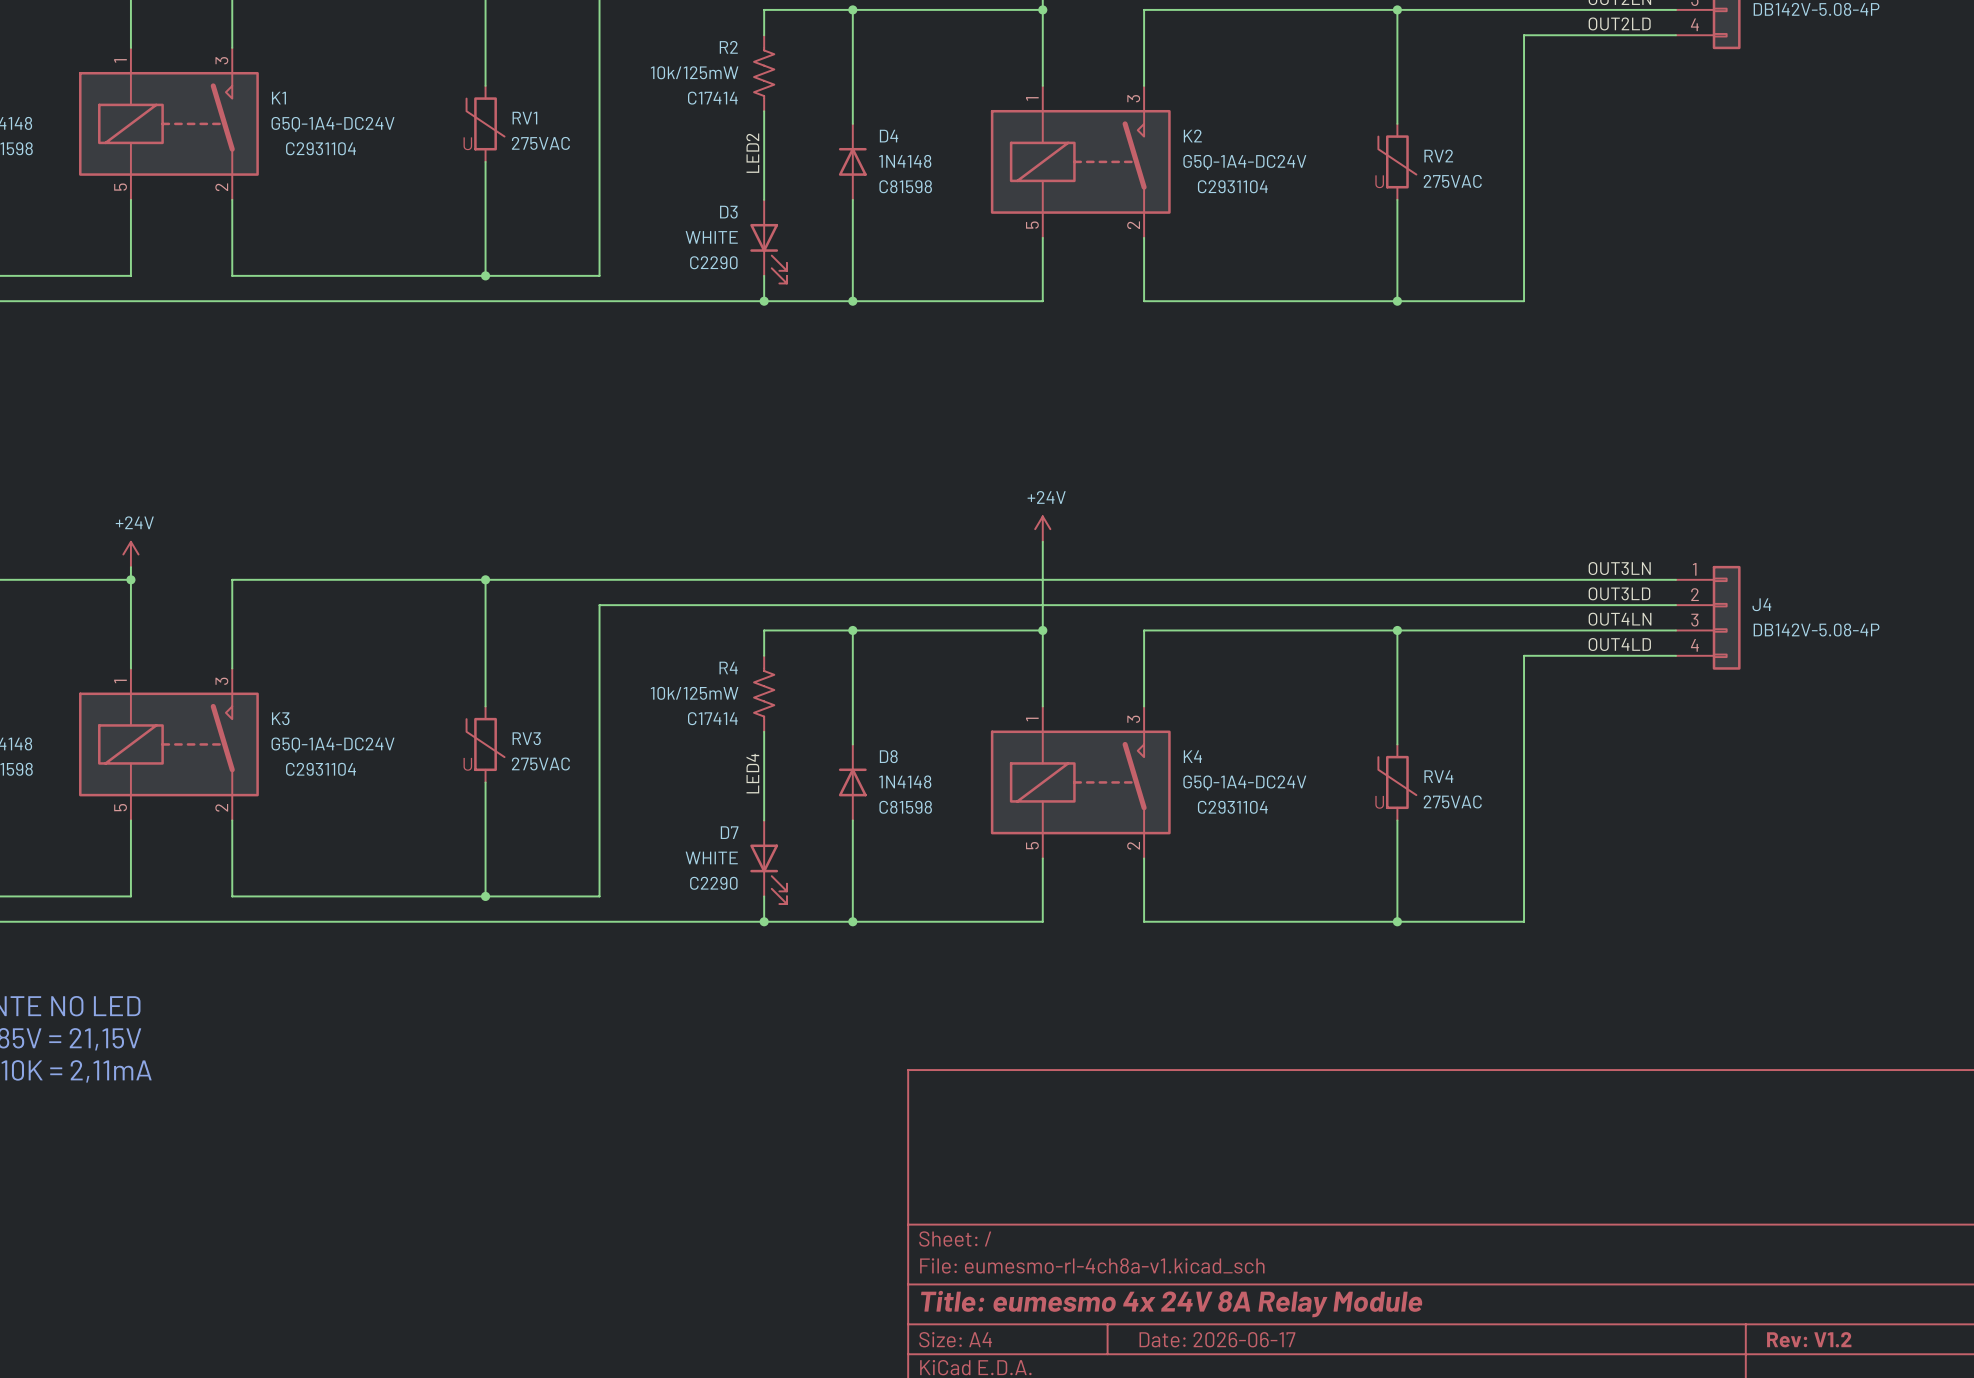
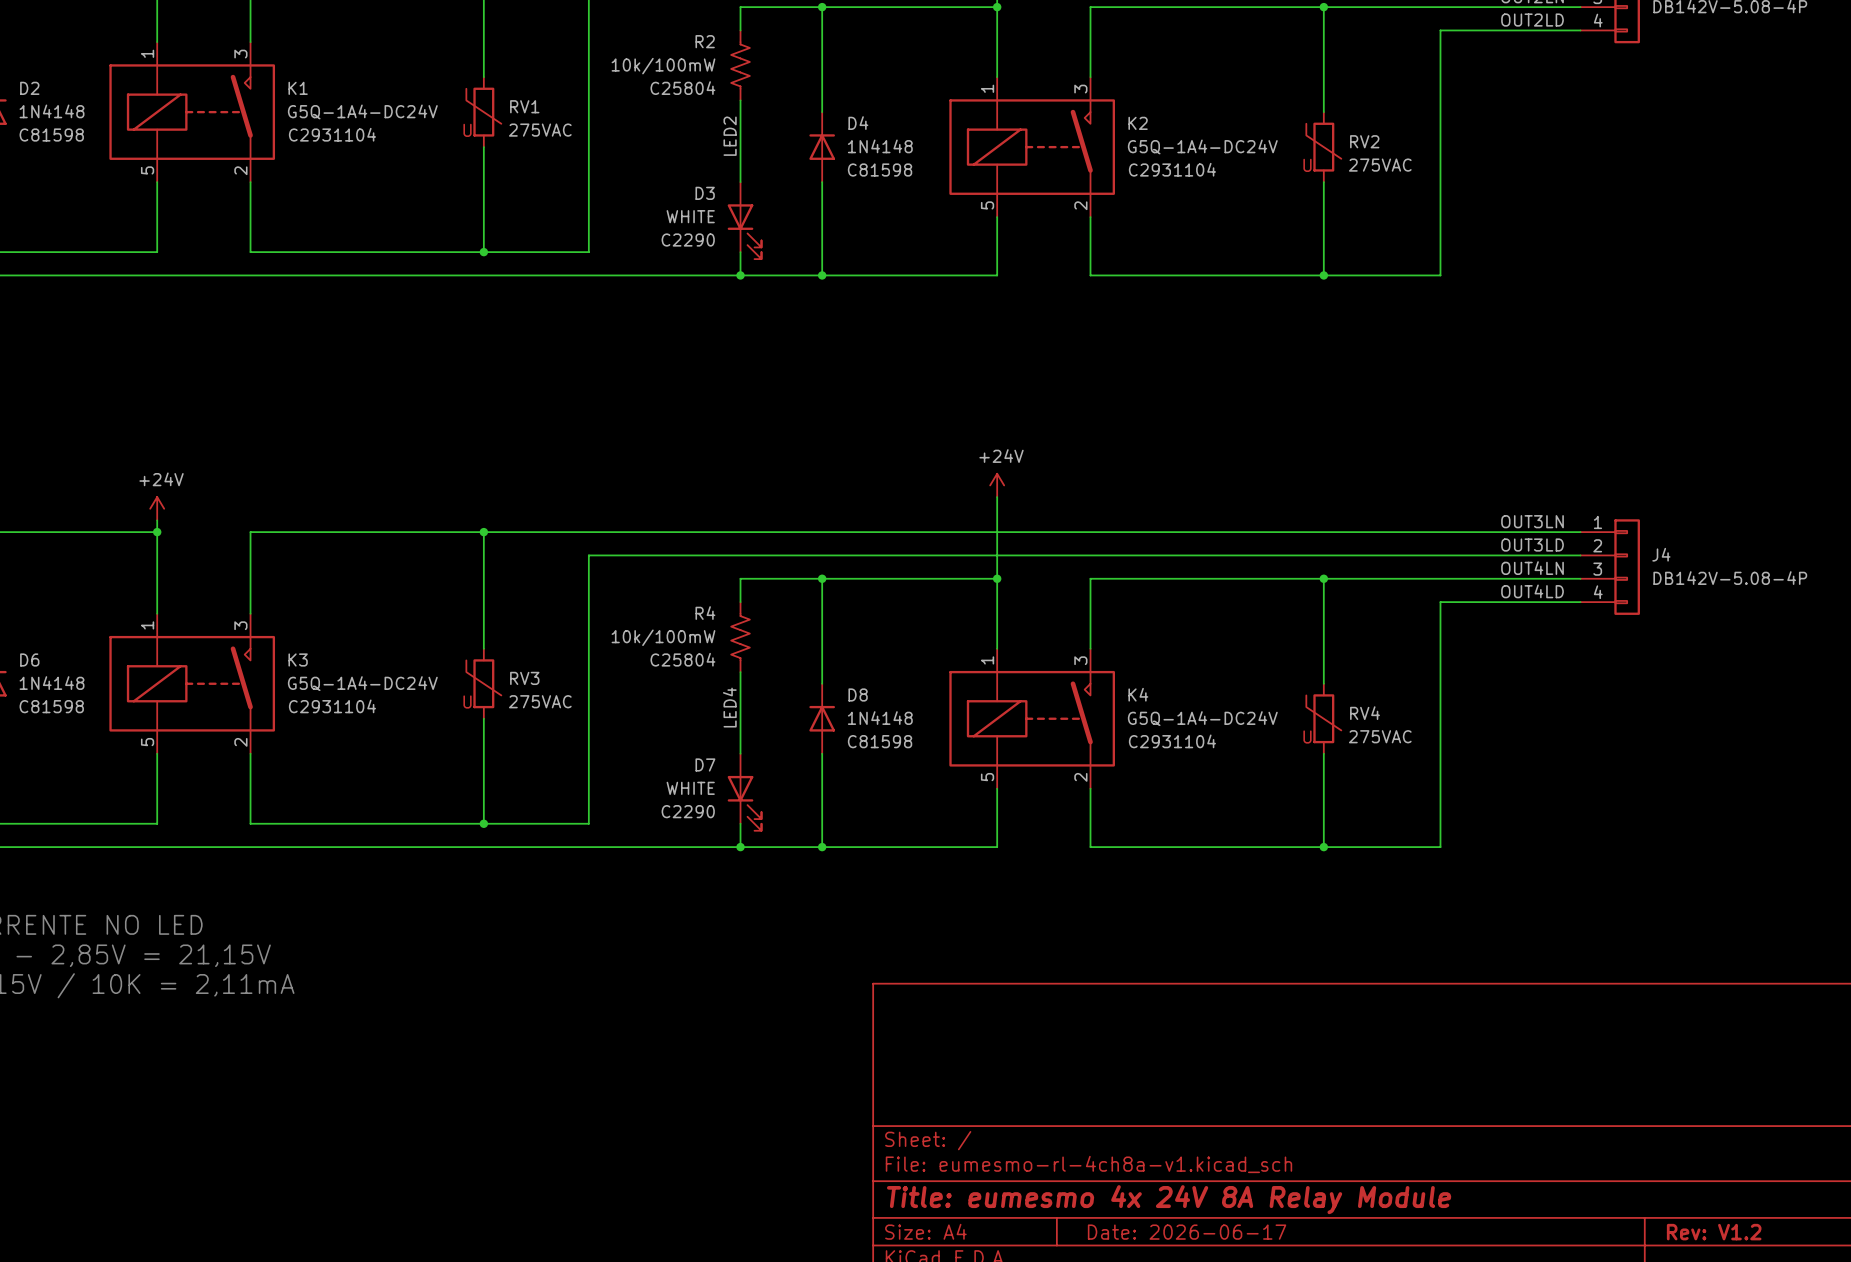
R2 value: 10k/125mW (694, 72) -> 10k/100mW (663, 66)
R2 text: C17414 (712, 98) -> C25804 (682, 88)
R4 value: 10k/125mW (694, 693) -> 10k/100mW (663, 637)
R4 text: C17414 (712, 718) -> C25804 (682, 659)

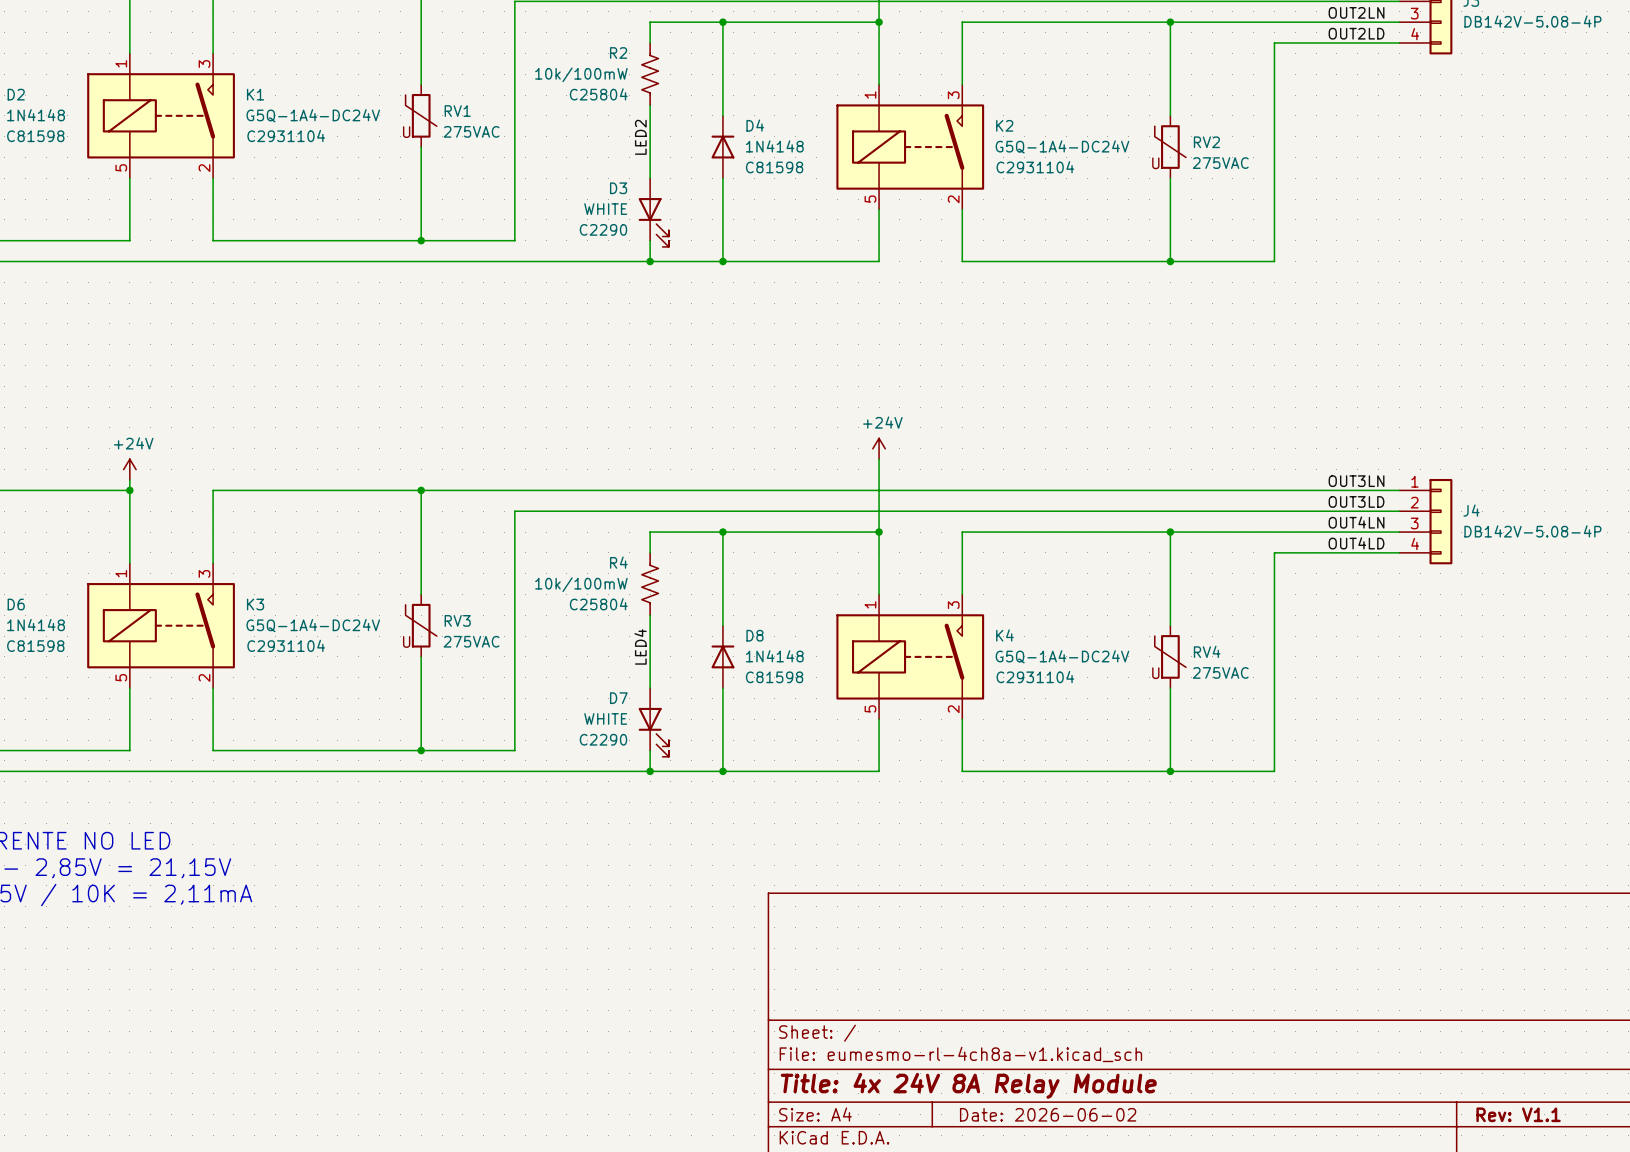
title block: Title: eumesmo 4x 24V 8A Relay Module (1169, 1199) -> Title: 4x 24V 8A Relay Module (968, 1085)
title block: Date: 2026-06-17 (1187, 1232) -> Date: 2026-06-02 (1048, 1114)
title block: Rev: V1.2 (1714, 1232) -> Rev: V1.1 (1518, 1114)

